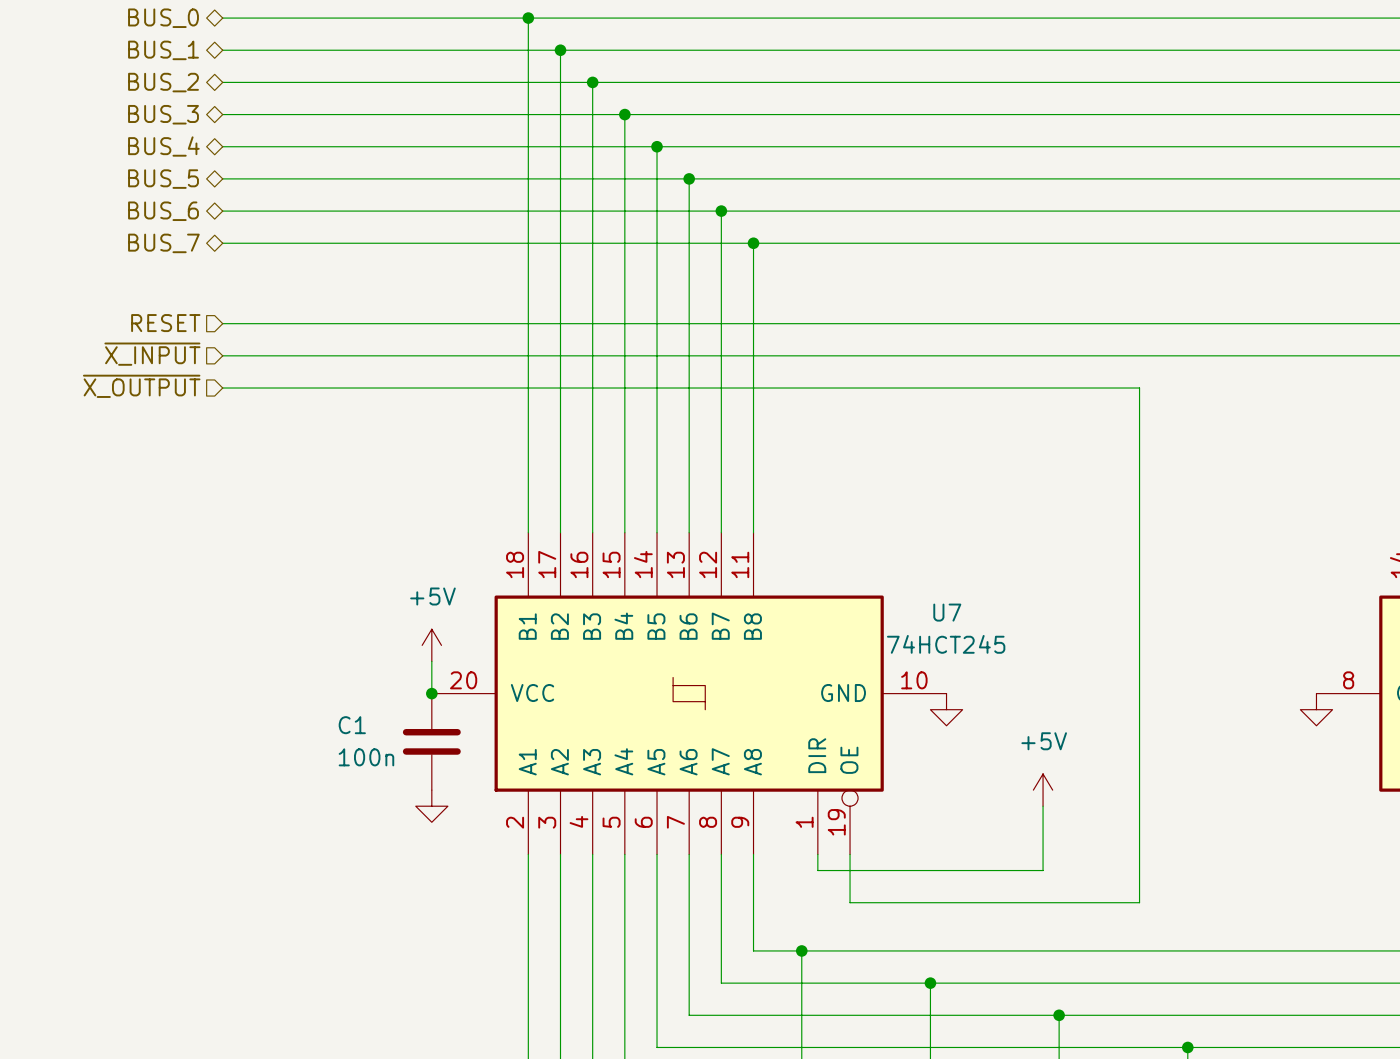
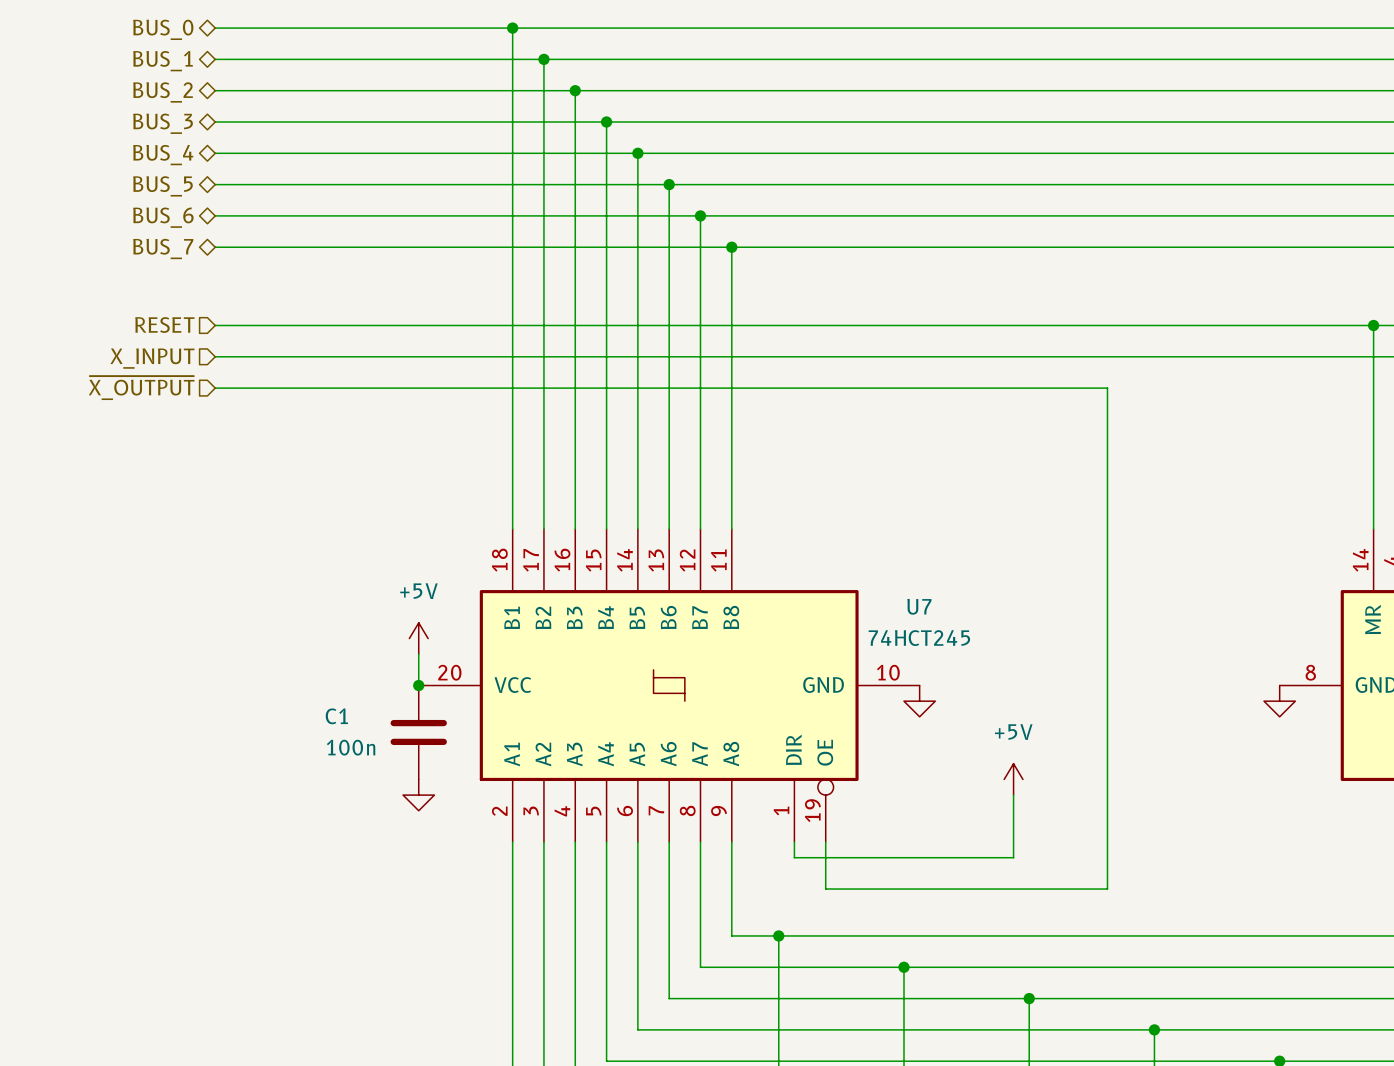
hierarchical label: ~{X_INPUT} (152, 354) -> X_INPUT (152, 358)

